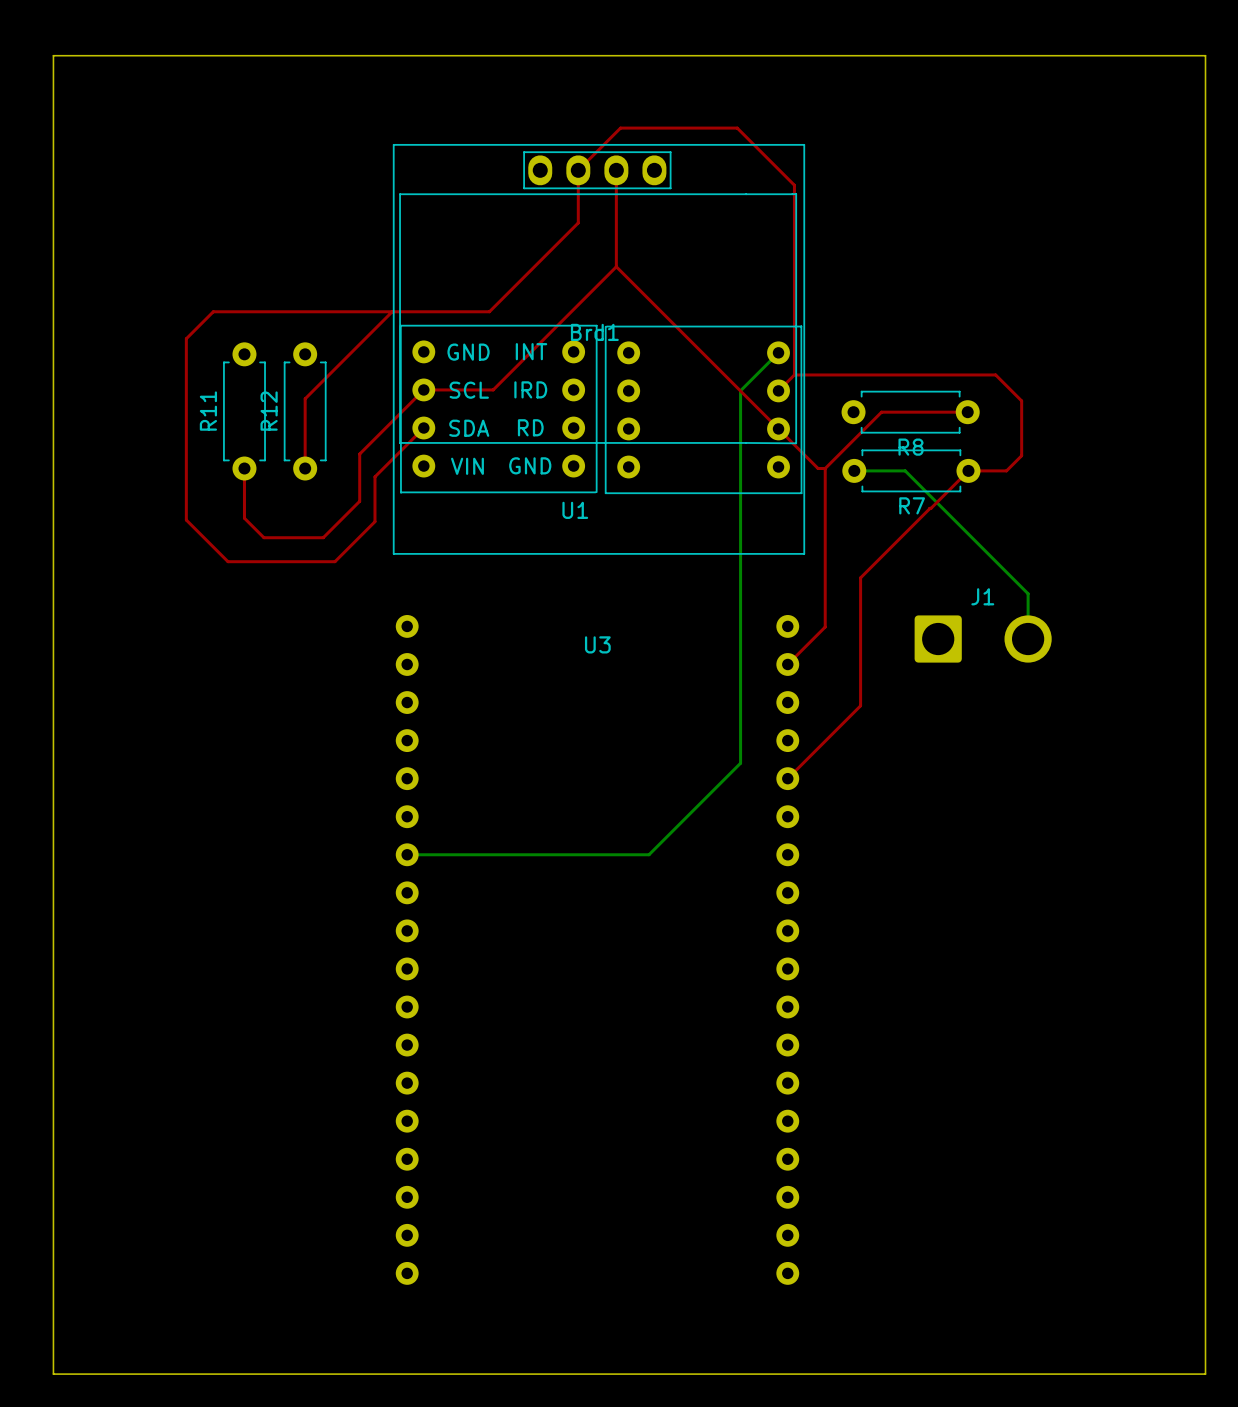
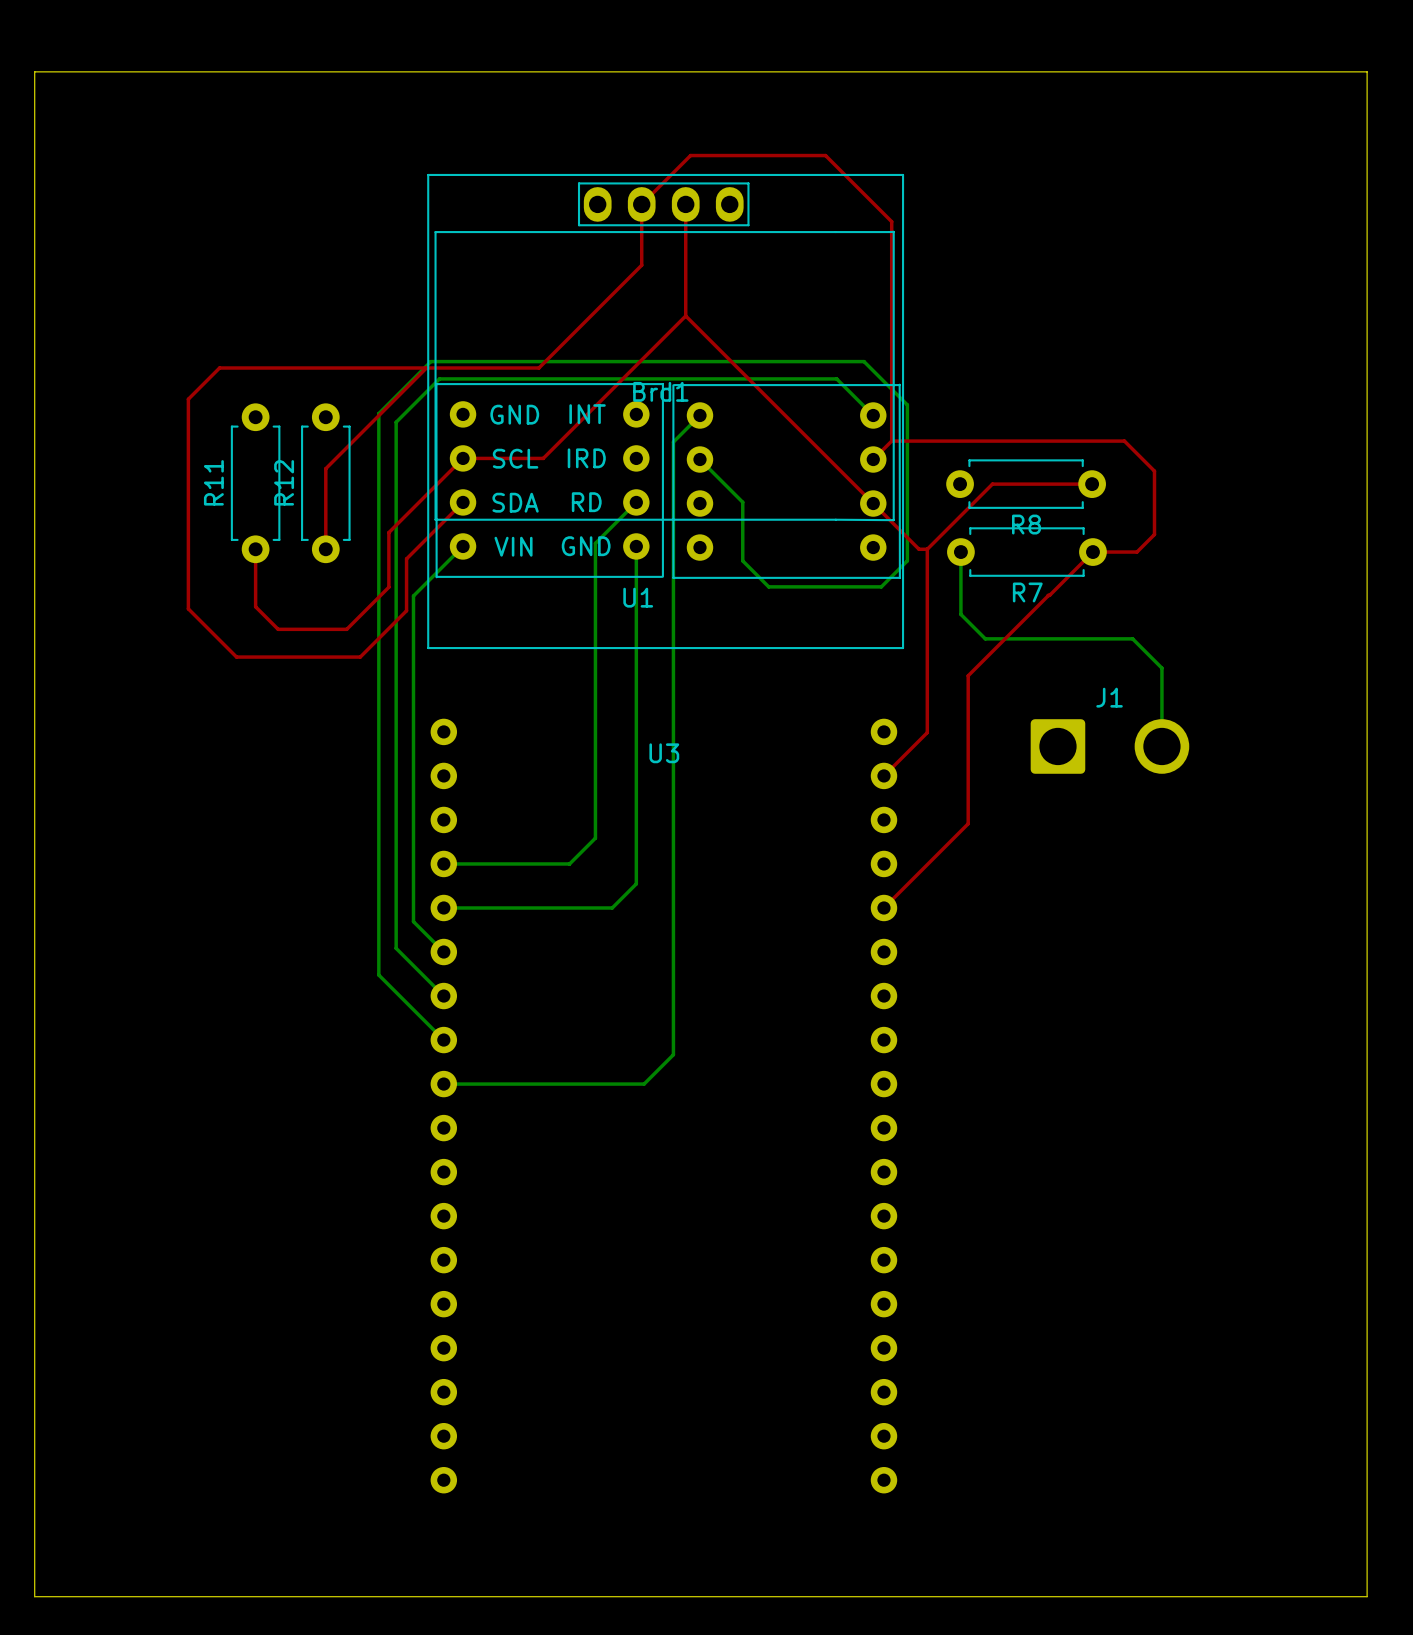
bottom track: none -> (699, 415) (673, 442) (673, 1054) (644, 1084) (444, 1084)
bottom track: (778, 352) (740, 390) (740, 763) (649, 854) (407, 854) -> (873, 415) (836, 378) (439, 378) (396, 422) (396, 948) (443, 996)
bottom track: none -> (699, 459) (742, 502) (742, 560) (768, 586) (881, 586) (907, 560) (907, 404) (864, 361) (430, 361) (378, 413) (378, 975) (443, 1040)
bottom track: none -> (636, 502) (595, 543) (595, 838) (569, 864)
bottom track: none -> (463, 546) (413, 596) (413, 921) (443, 952)
bottom track: none -> (636, 546) (636, 883) (612, 907) (443, 907)
bottom track: (854, 470) (905, 470) (1028, 593) -> (960, 552) (960, 614) (985, 638) (1132, 638) (1161, 668) (1161, 694)
bottom track: none -> (443, 863) (569, 863)

